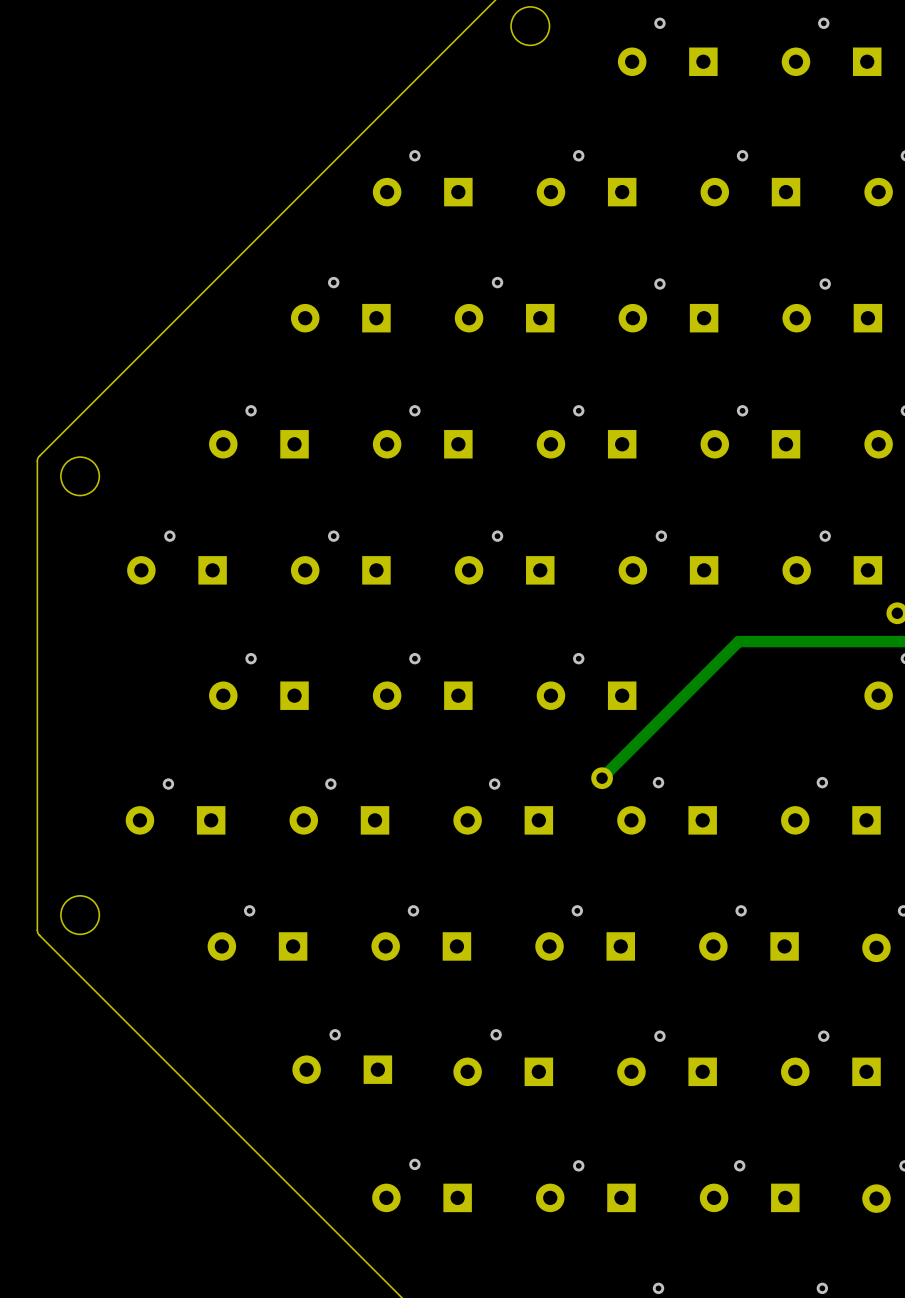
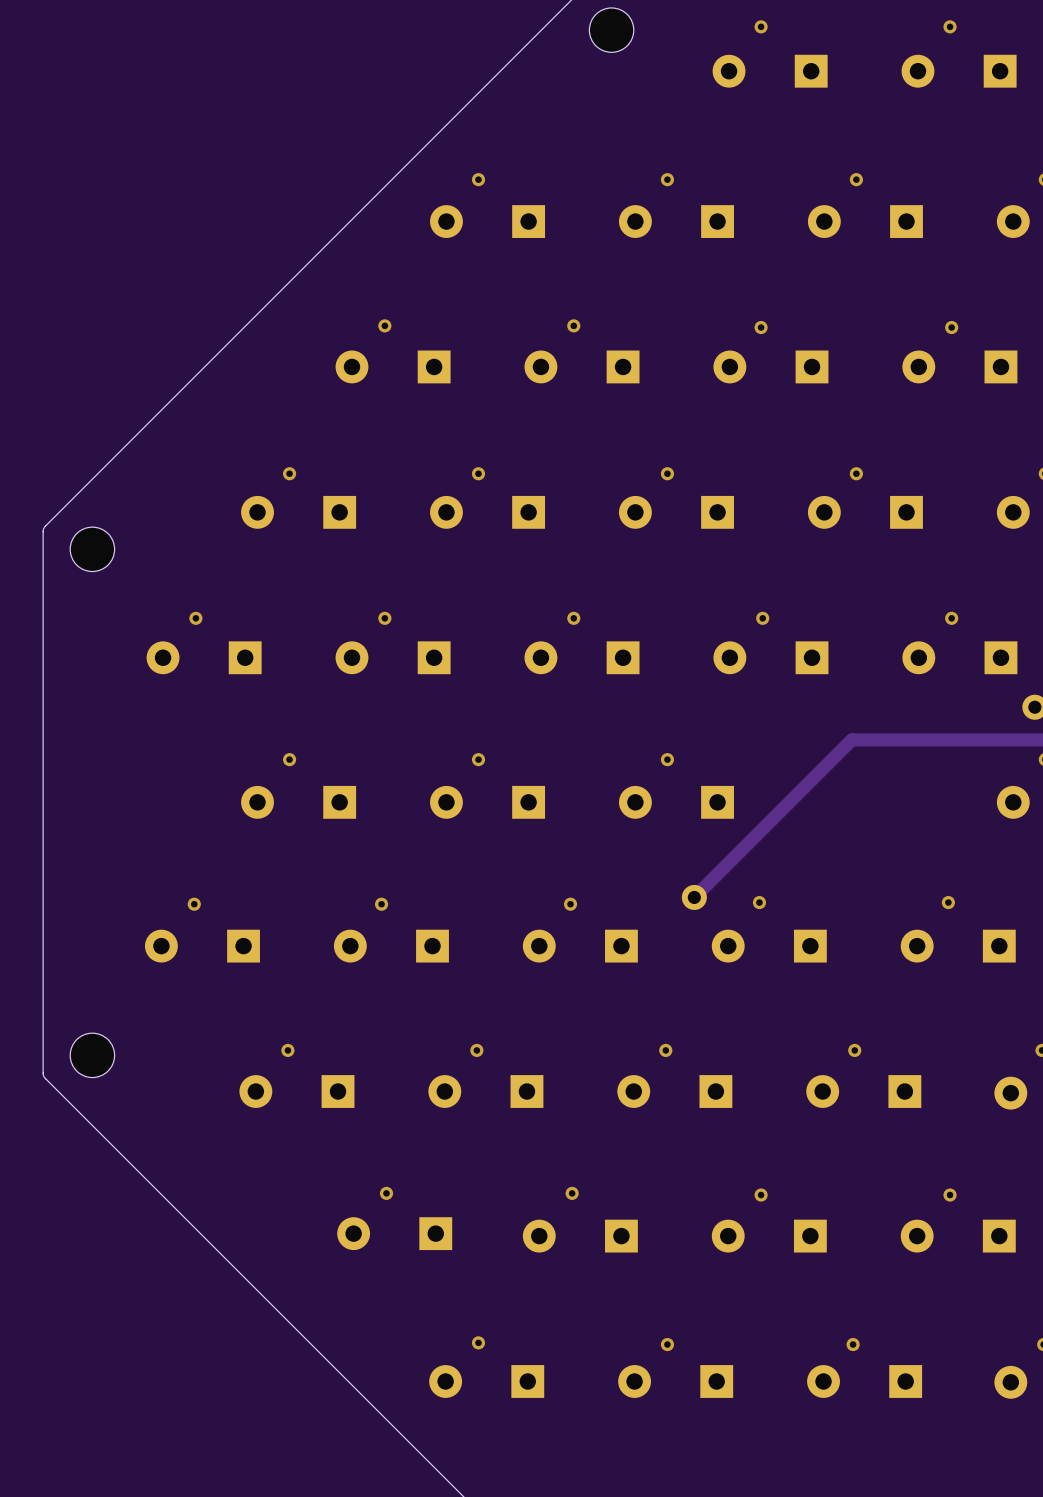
via: (658, 1288) -> none
via: (822, 1288) -> none

